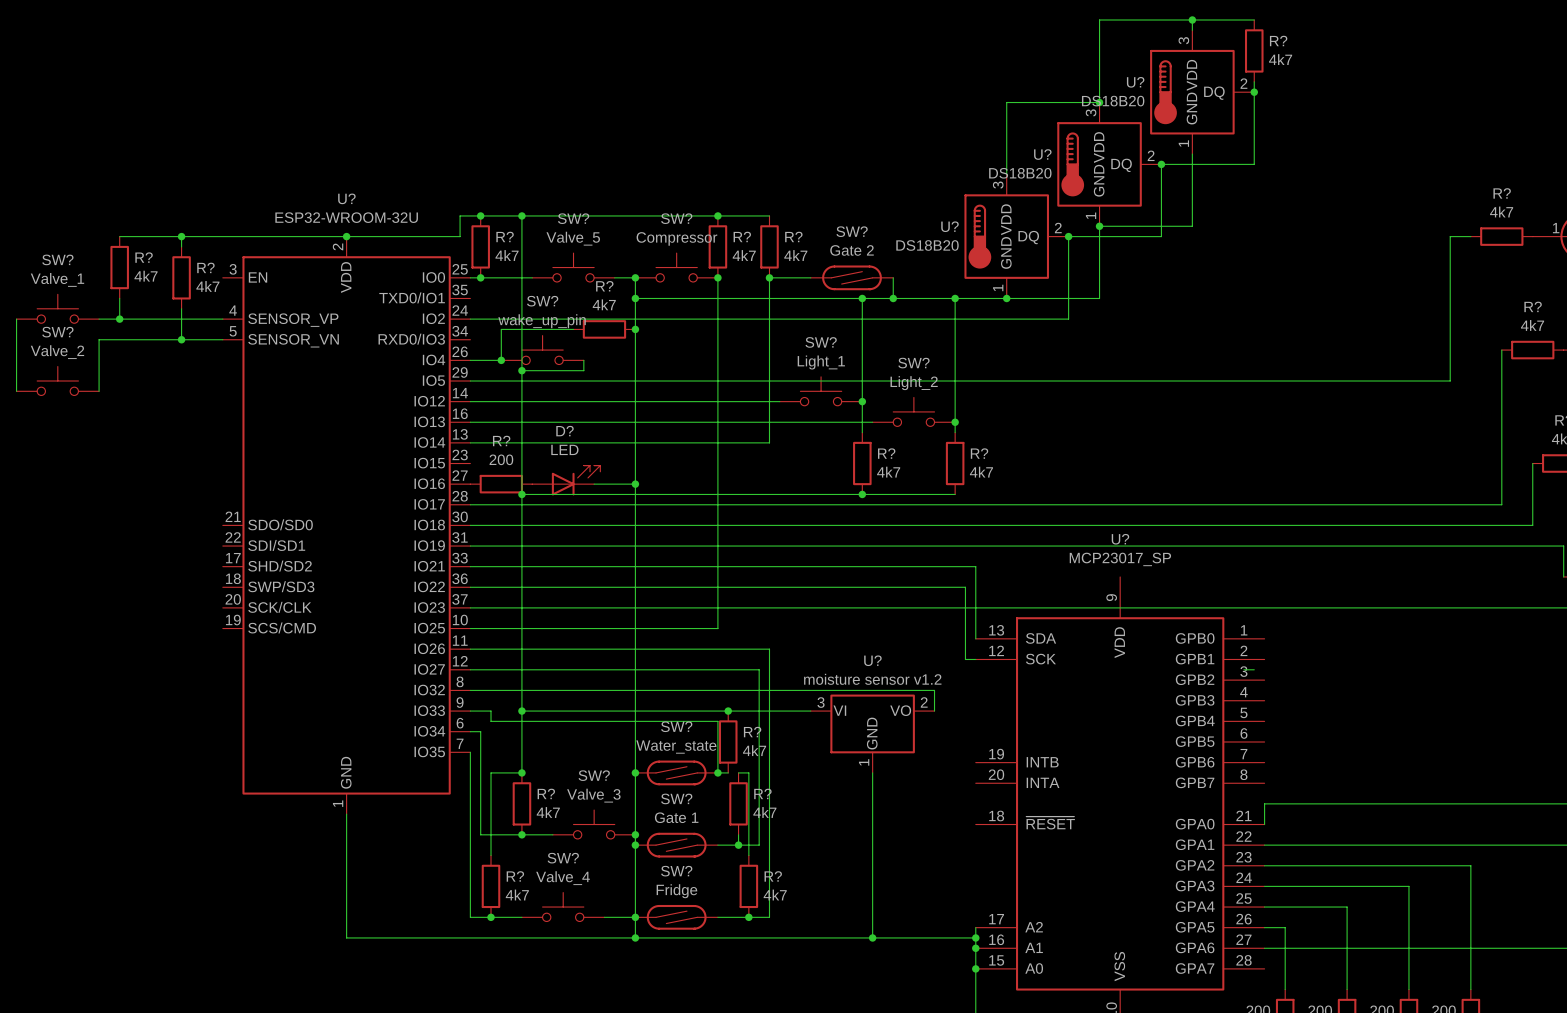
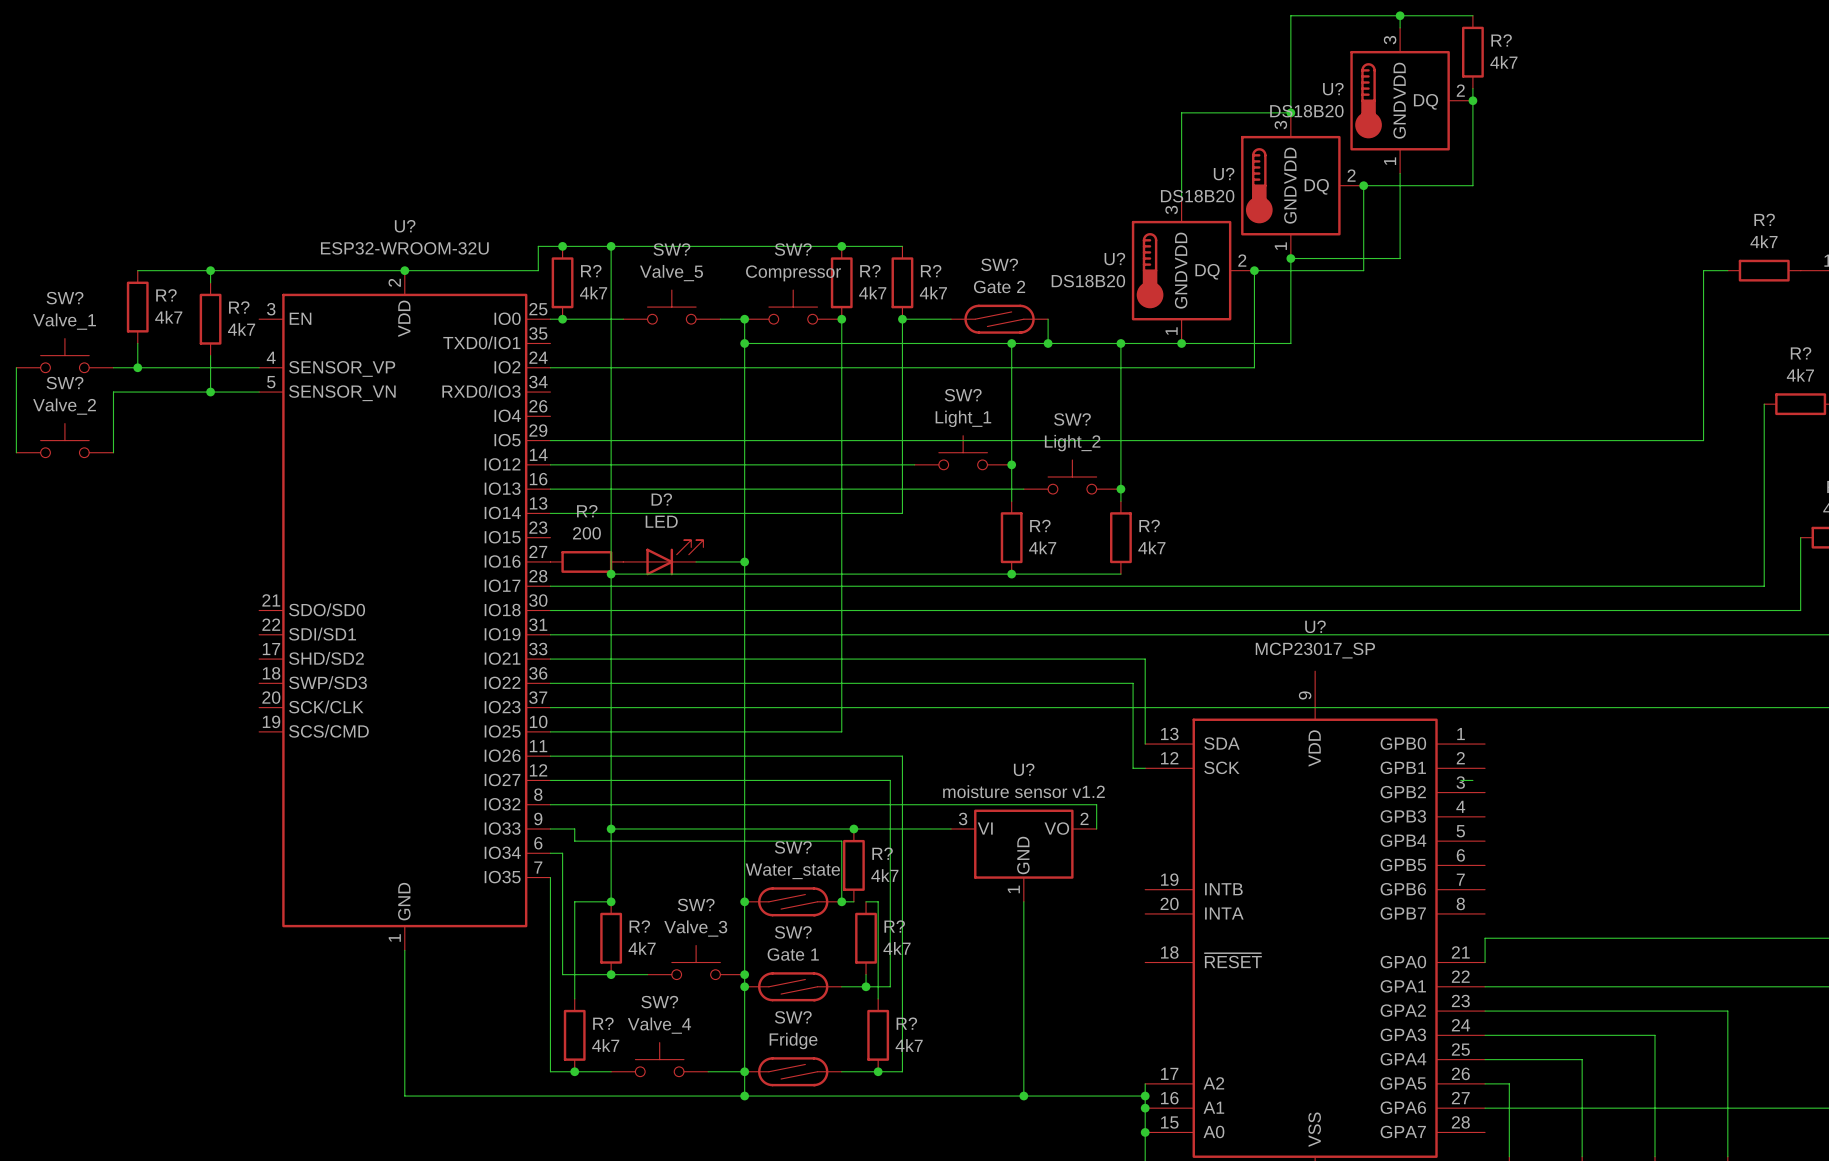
wire: (573, 329) (501, 329) (501, 360) (470, 360) -> none
R?: 4k7 (604, 329) -> none
junction: (635, 329) -> none
SW?: wake_up_pin (542, 350) -> none
junction: (501, 360) -> none
wire: (583, 360) (583, 370) (521, 370) -> none
junction: (521, 370) -> none

